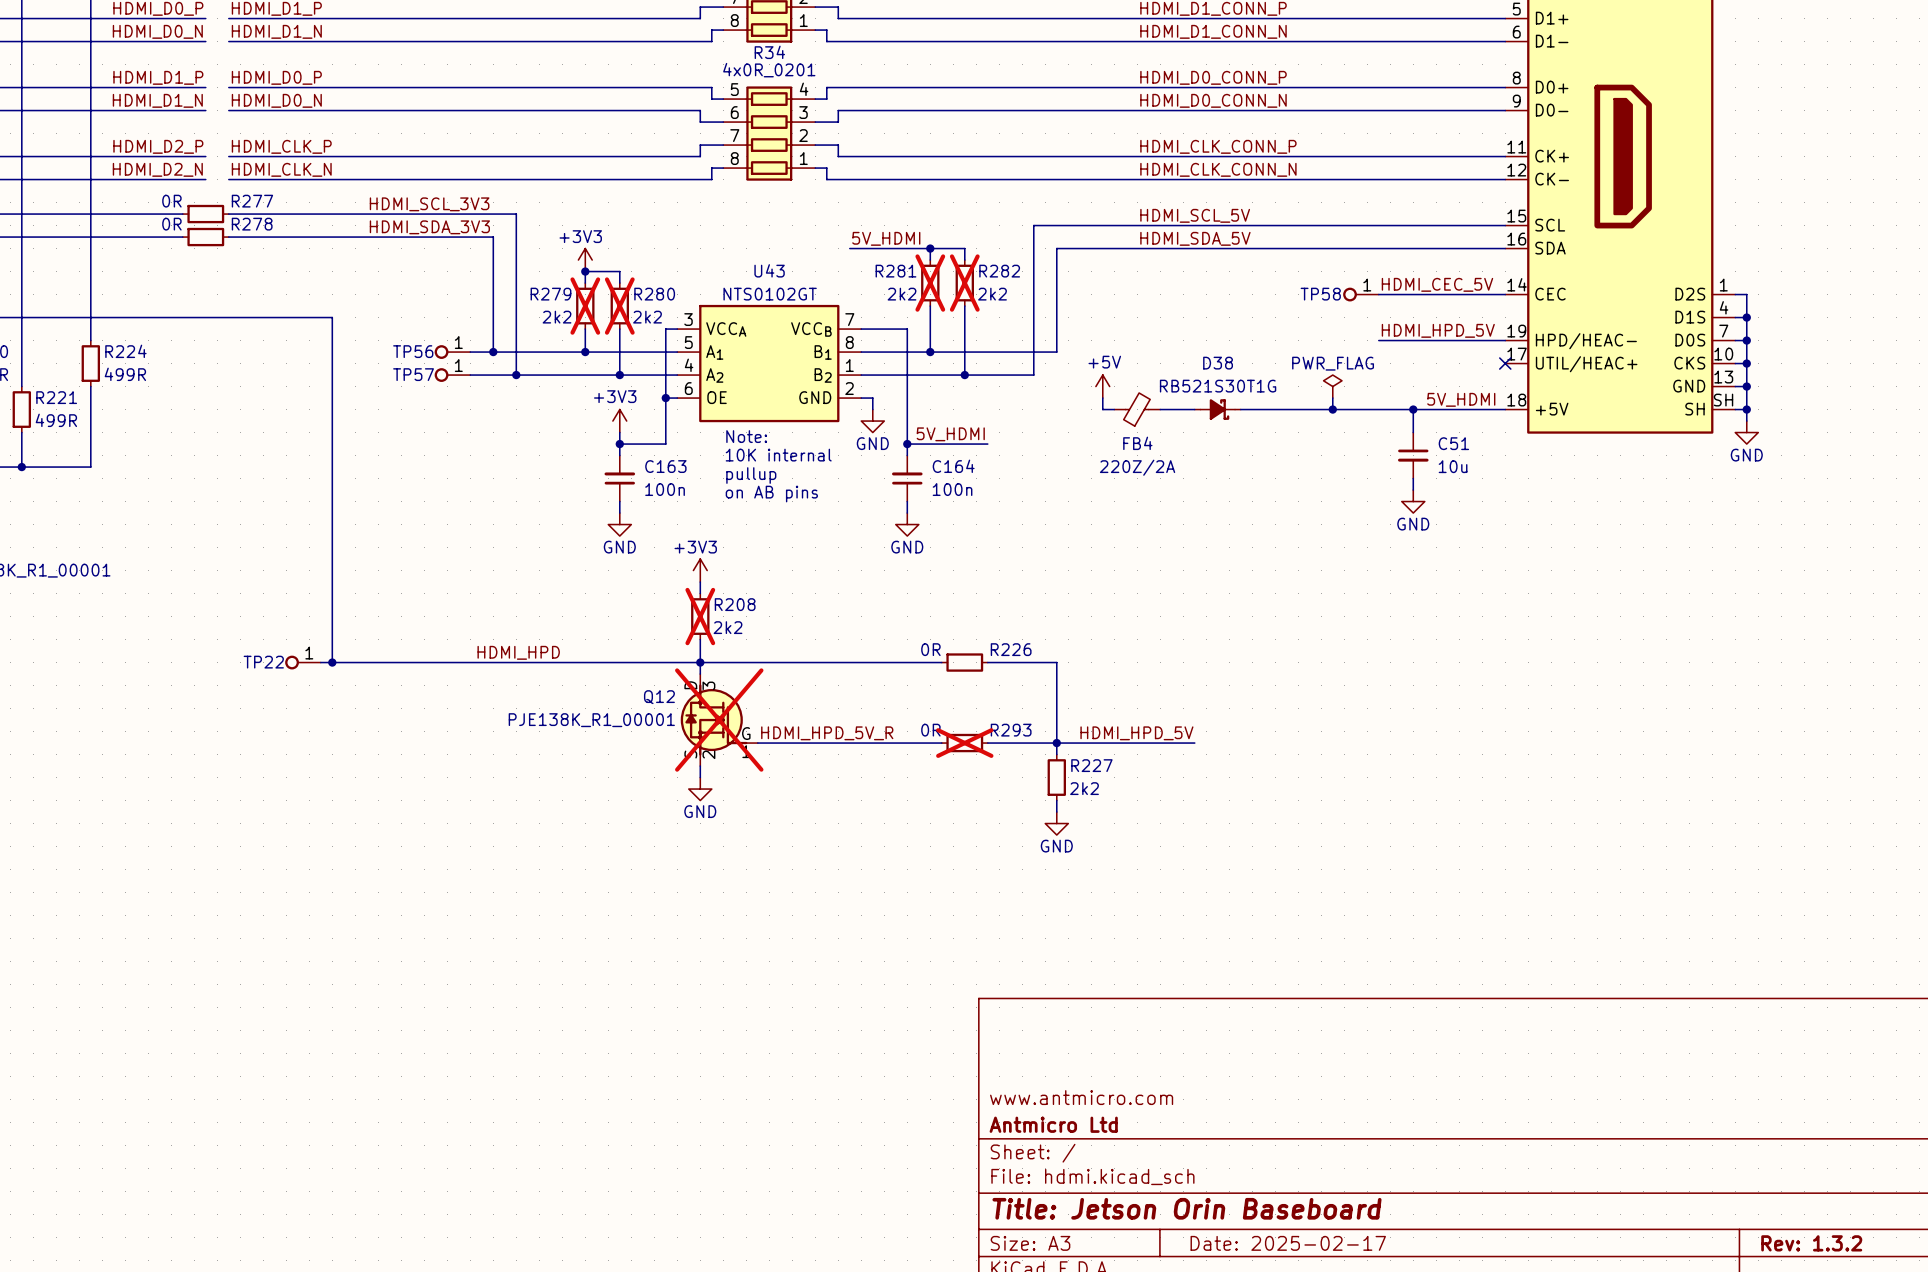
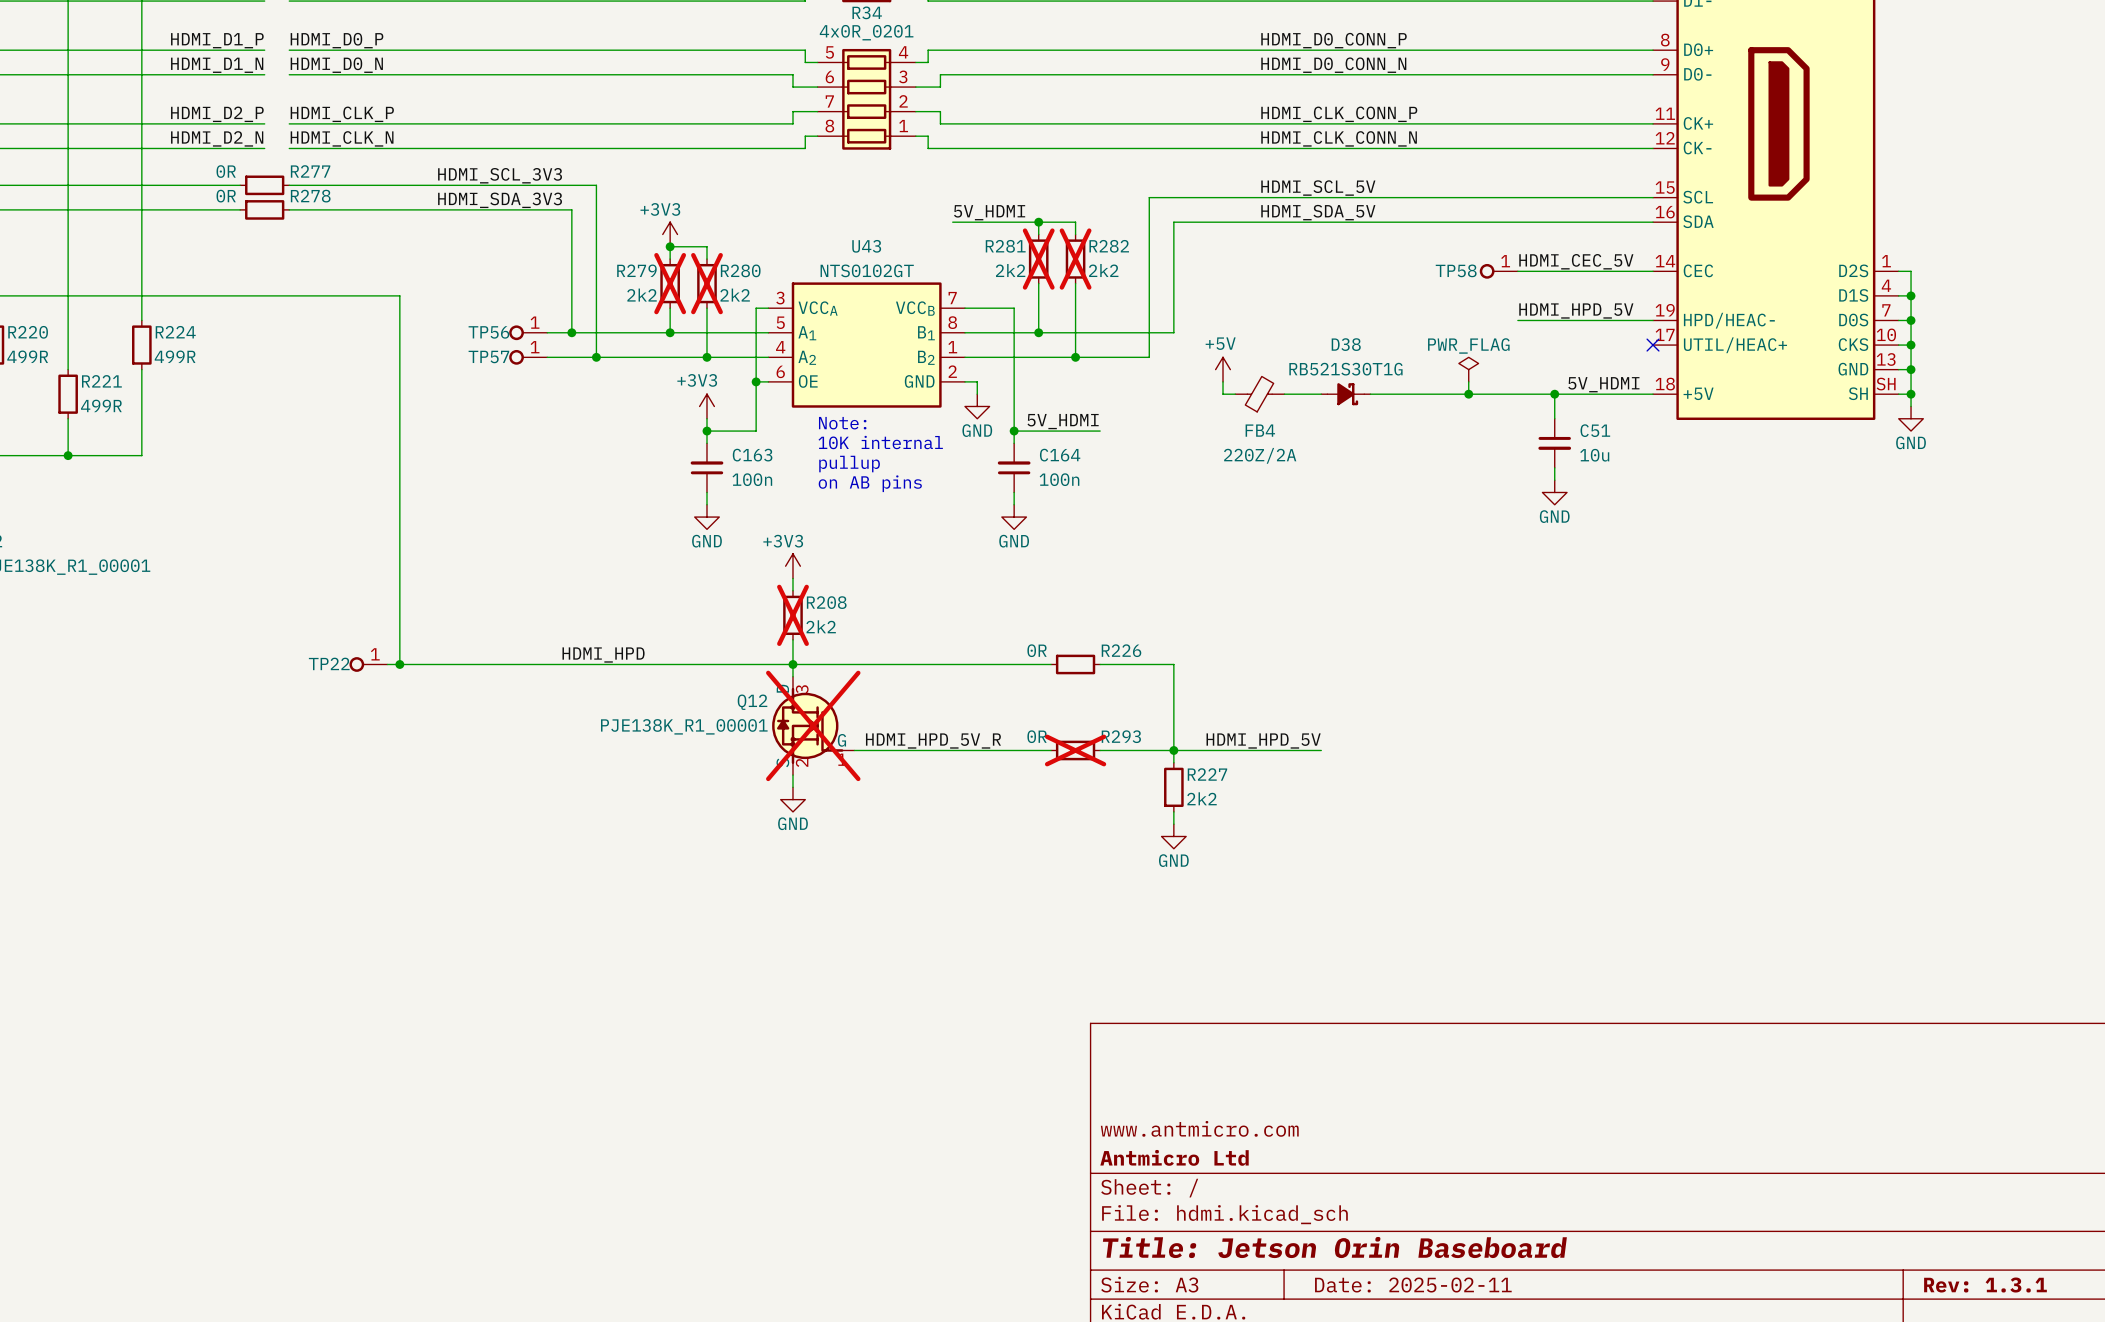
title block: Date: 2025-02-17 (1288, 1243) -> Date: 2025-02-11 (1413, 1285)
title block: Rev: 1.3.2 (1811, 1243) -> Rev: 1.3.1 (1985, 1285)

